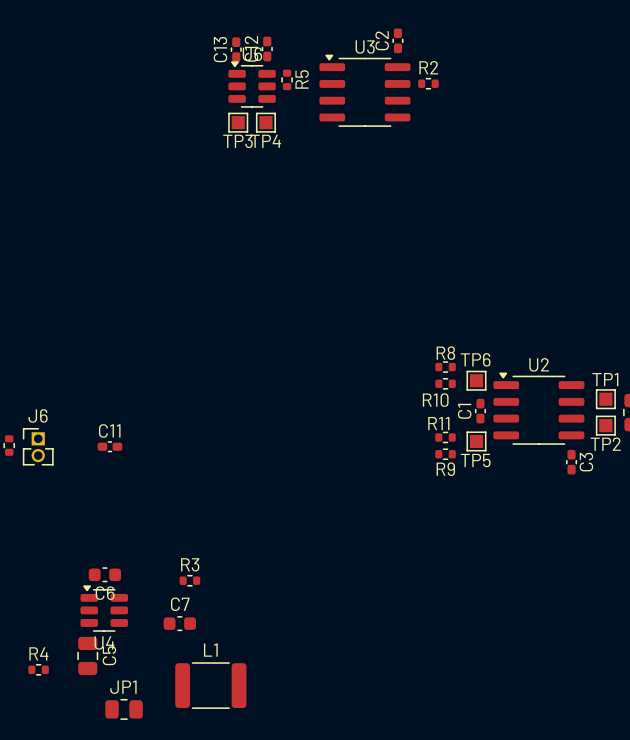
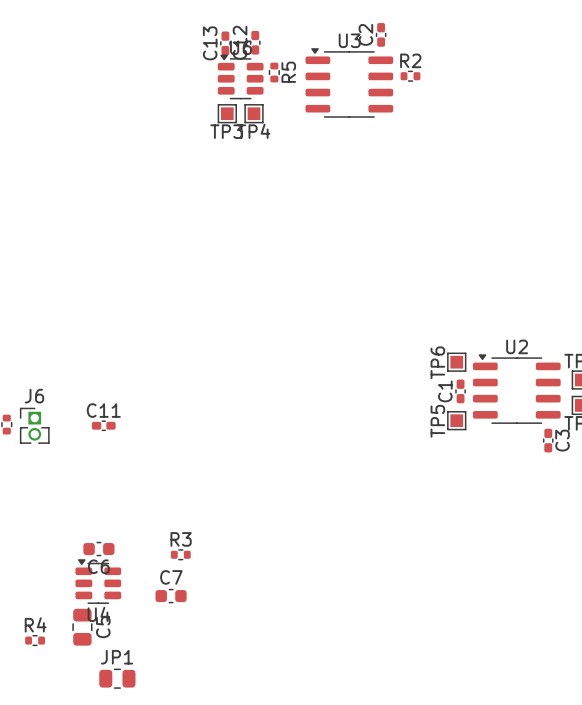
TP6 name rotation: 0° (475, 359) -> 90° counterclockwise (437, 362)
R8: (445, 367) -> none
R10: (445, 383) -> none
R11: (445, 437) -> none
R9: (445, 454) -> none
TP5 name rotation: 0° (475, 460) -> 90° counterclockwise (437, 421)
L1: (210, 685) -> none

